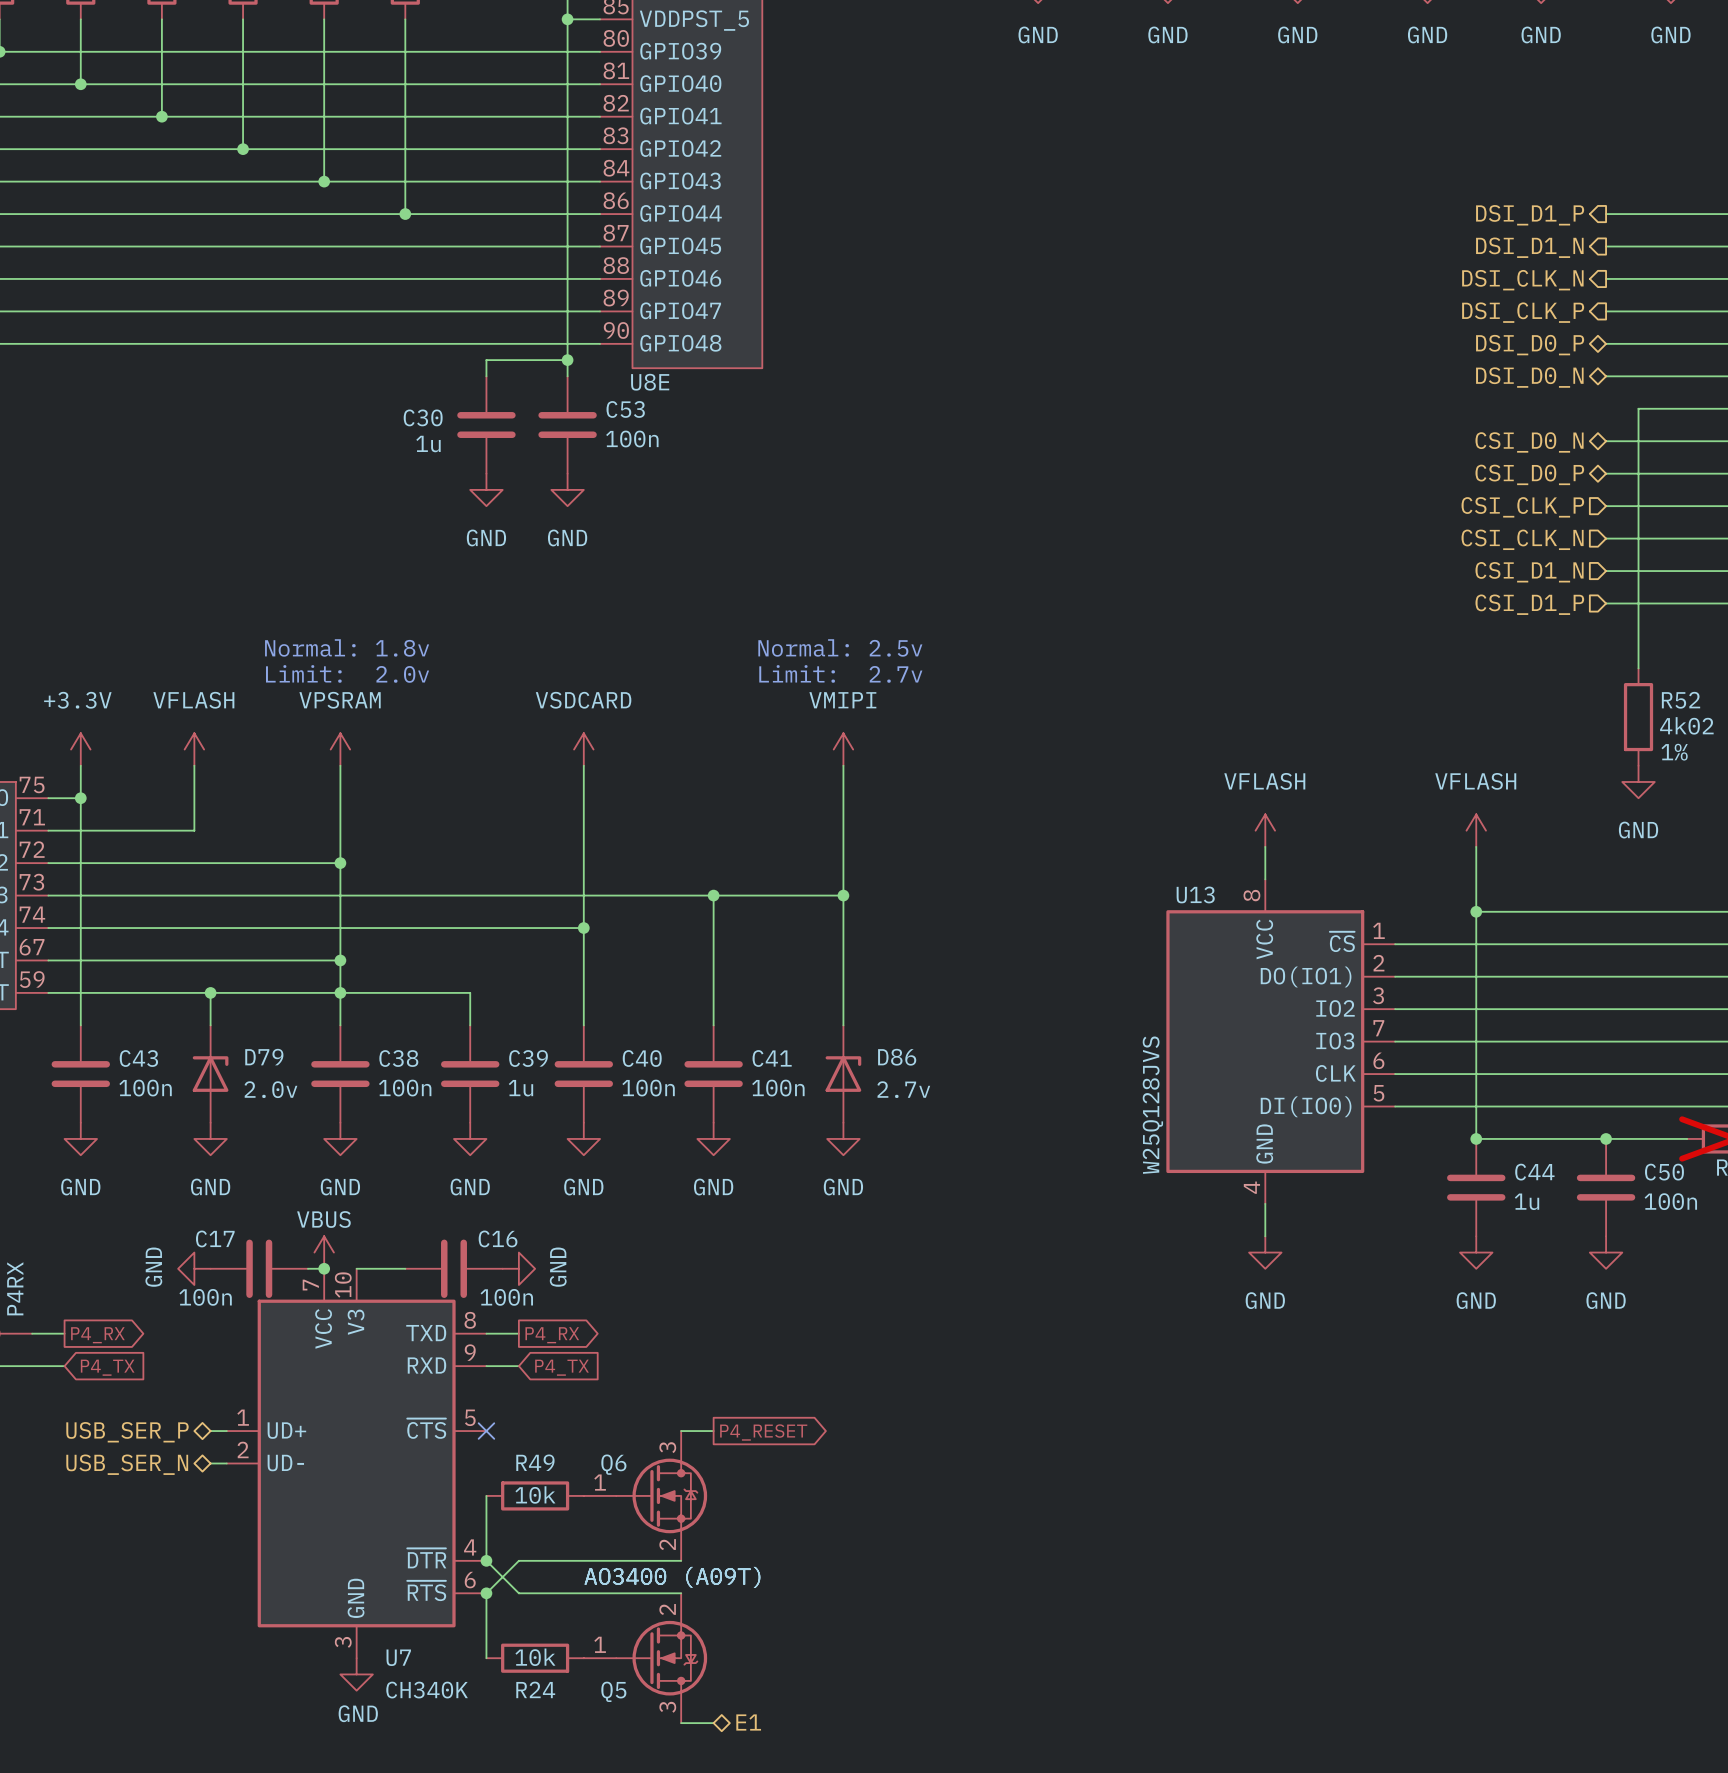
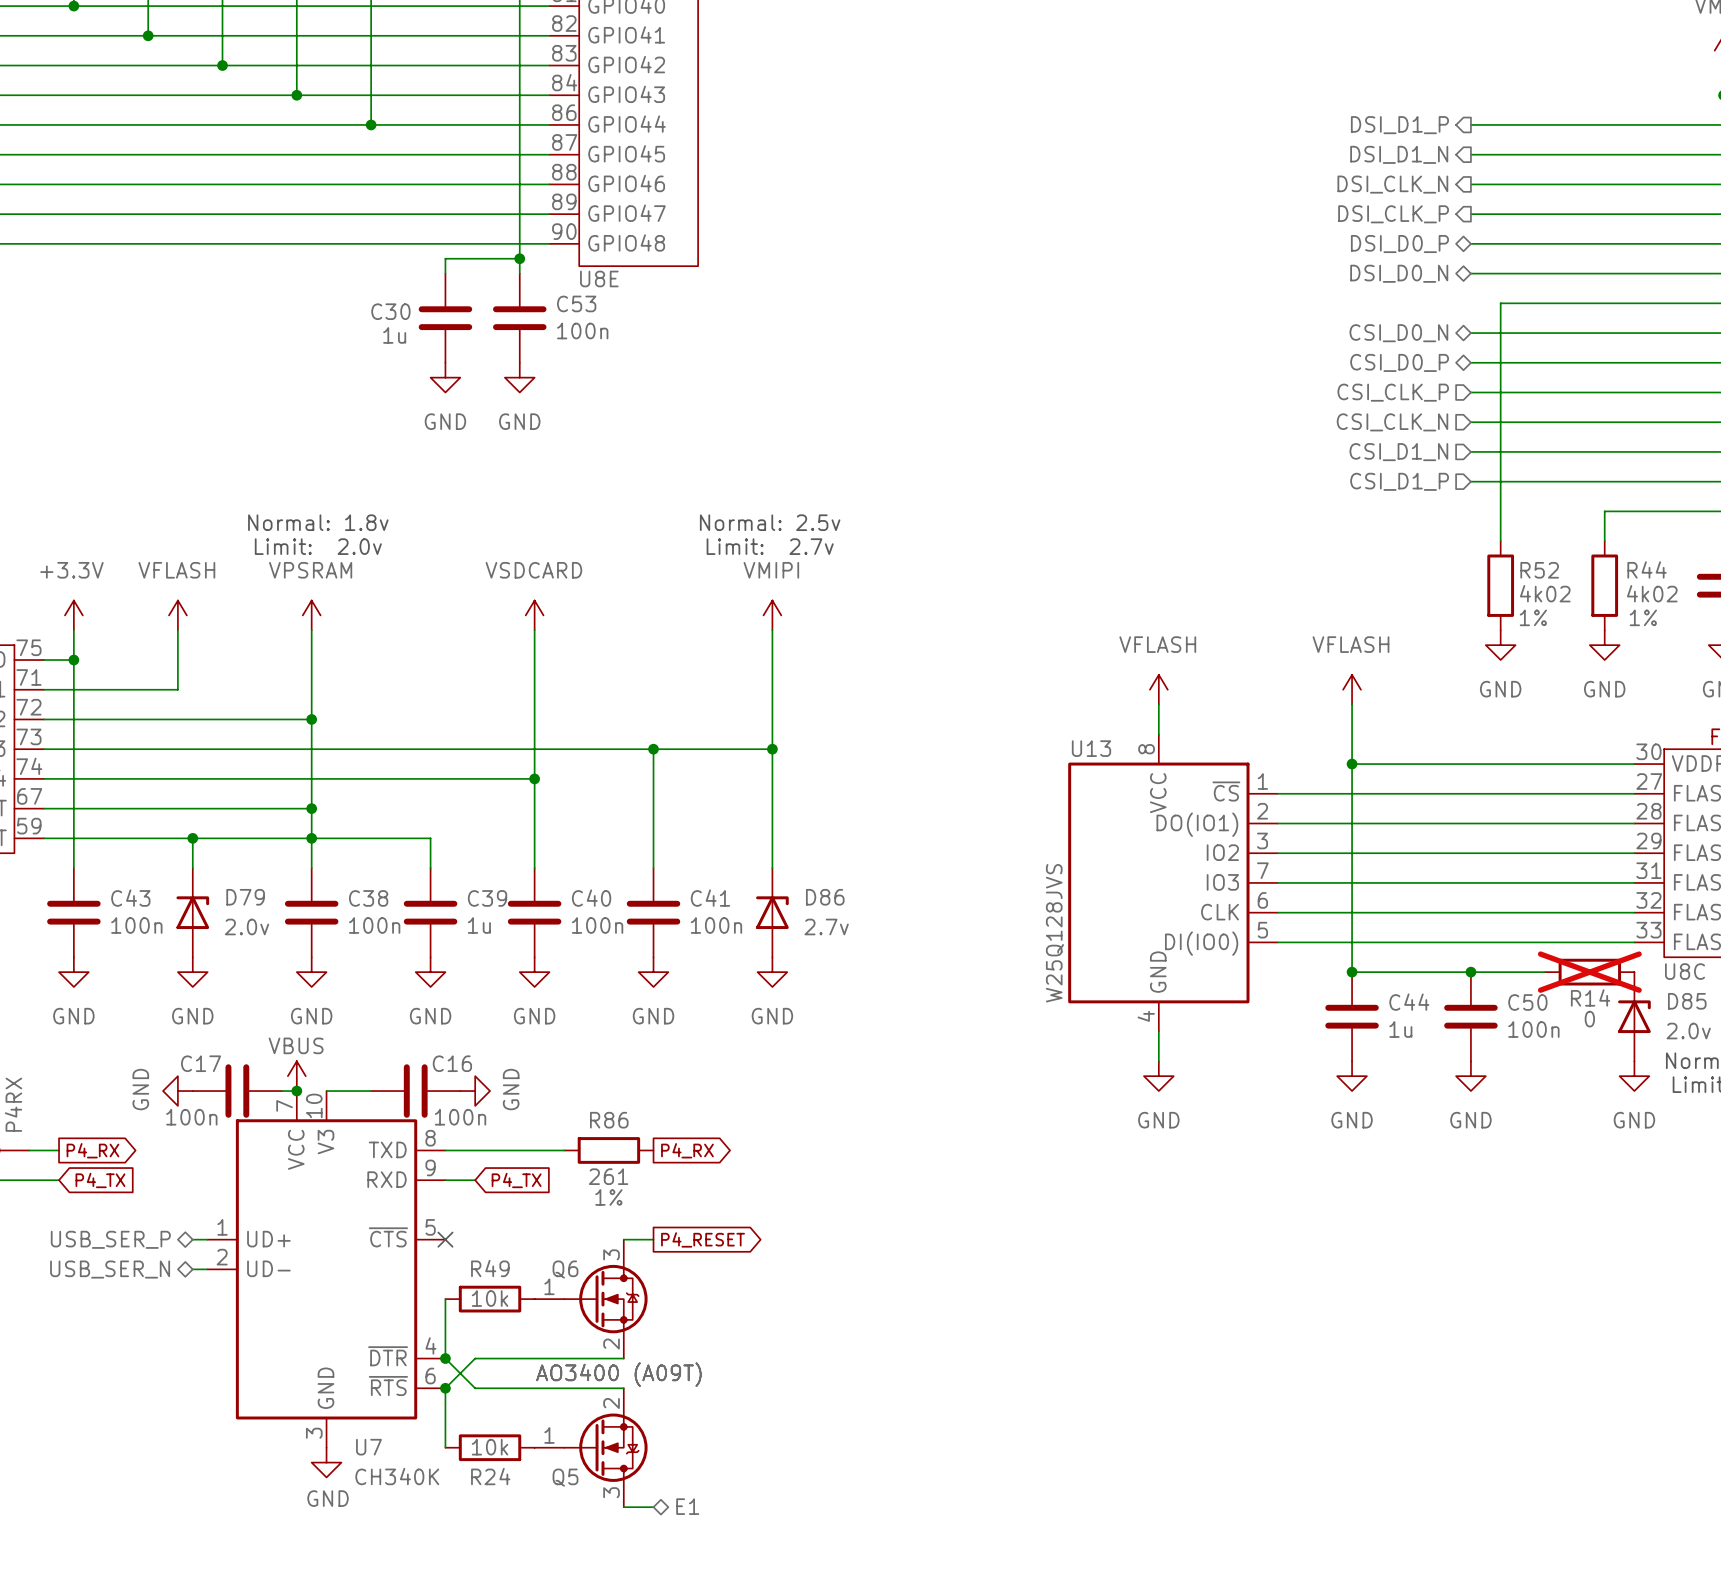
wire: none -> (475, 1150) (564, 1150)
R86: none -> 261 (608, 1150)
global label position: P4_RX (552, 1335) -> P4_RX (687, 1150)

